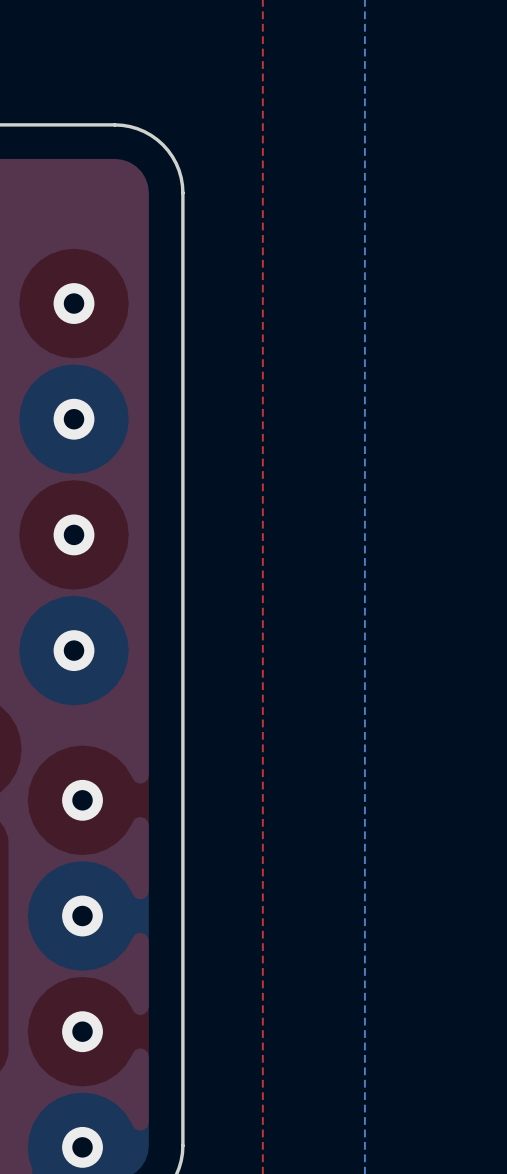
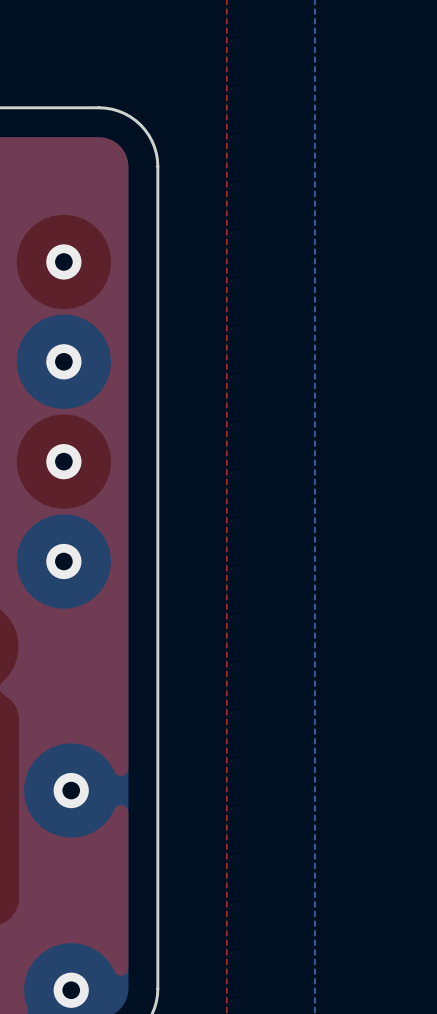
via: (82, 800) -> none
via: (82, 1031) -> none

